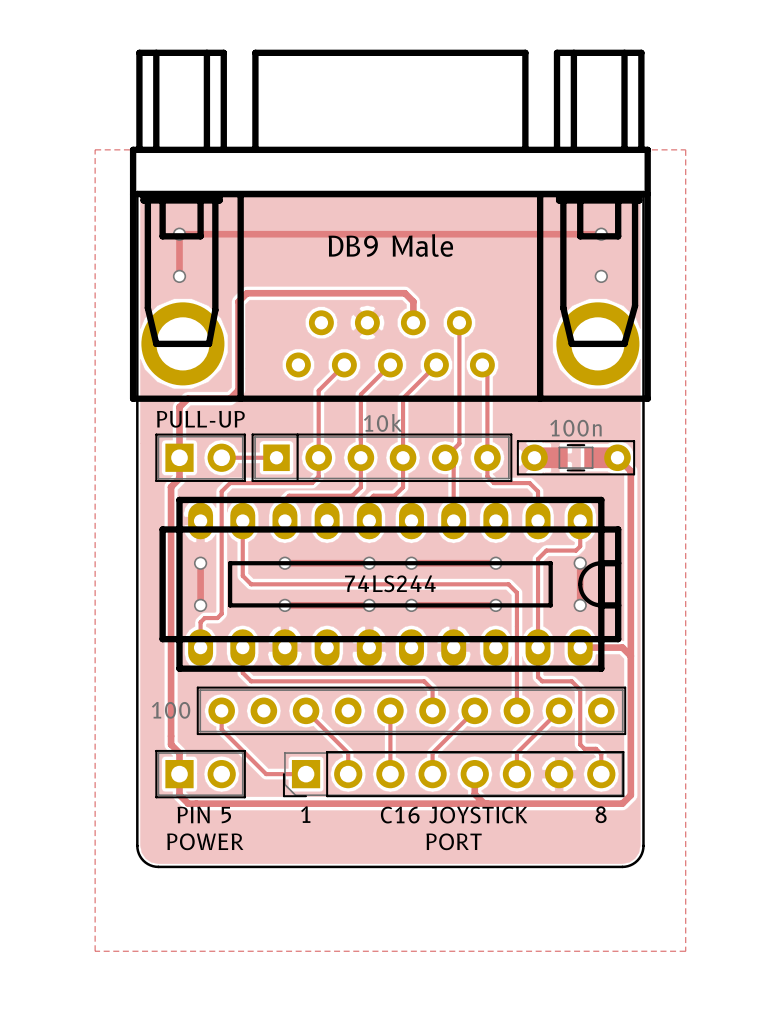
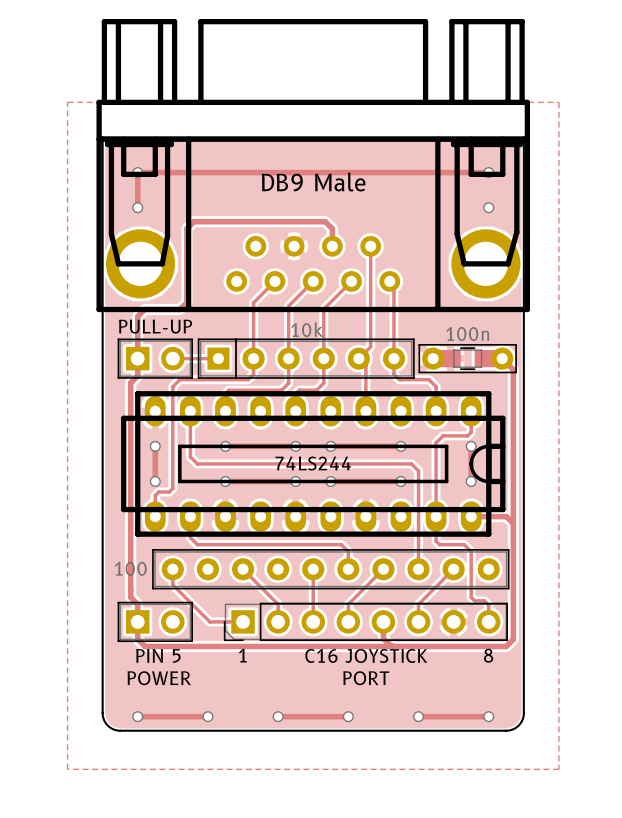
board edge: (137, 845) (138, 853) (143, 860) (150, 865) (158, 866) (622, 866) (630, 865) (637, 860) (641, 853) (643, 845) -> (102, 681) (103, 719) (111, 728) (120, 730) (508, 730) (516, 727) (523, 717) (523, 681)
track: none -> (137, 716) (207, 716)
via: none -> (137, 716)
via: none -> (207, 716)
track: none -> (278, 716) (348, 716)
via: none -> (278, 716)
via: none -> (348, 716)
track: none -> (418, 716) (488, 716)
via: none -> (418, 716)
via: none -> (488, 716)

